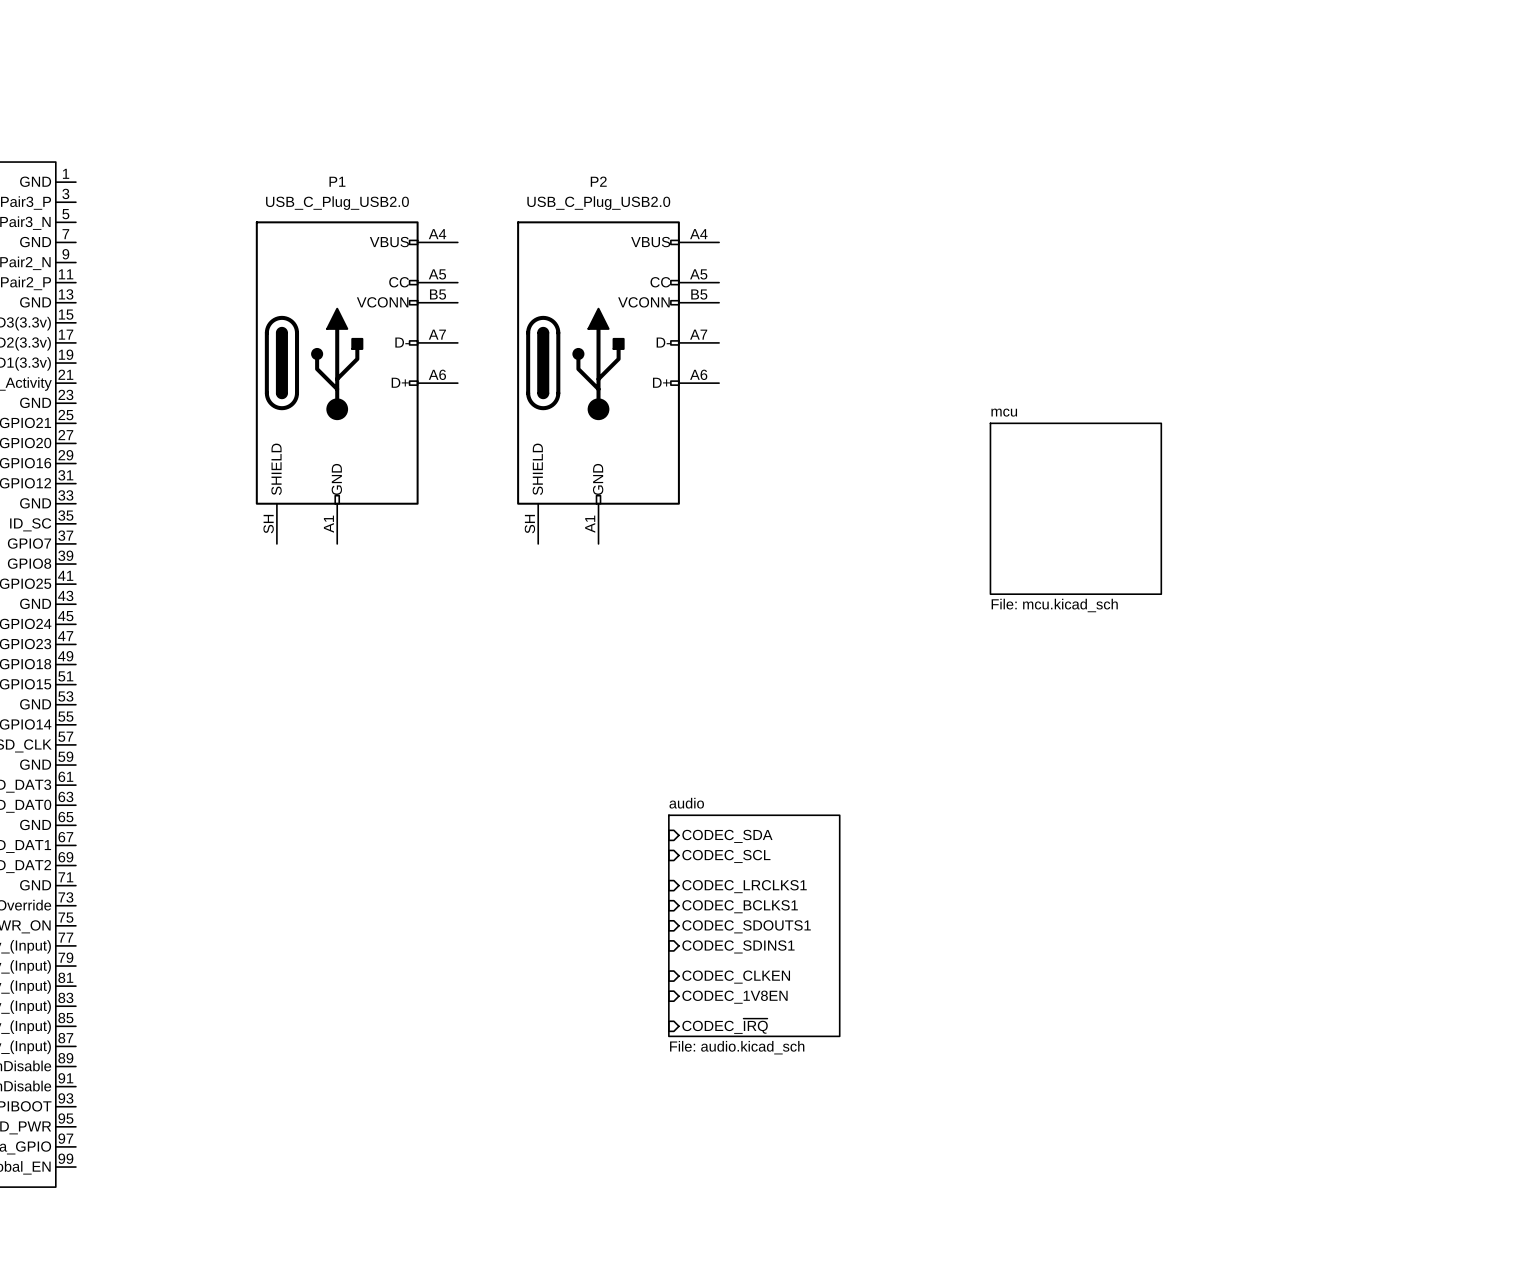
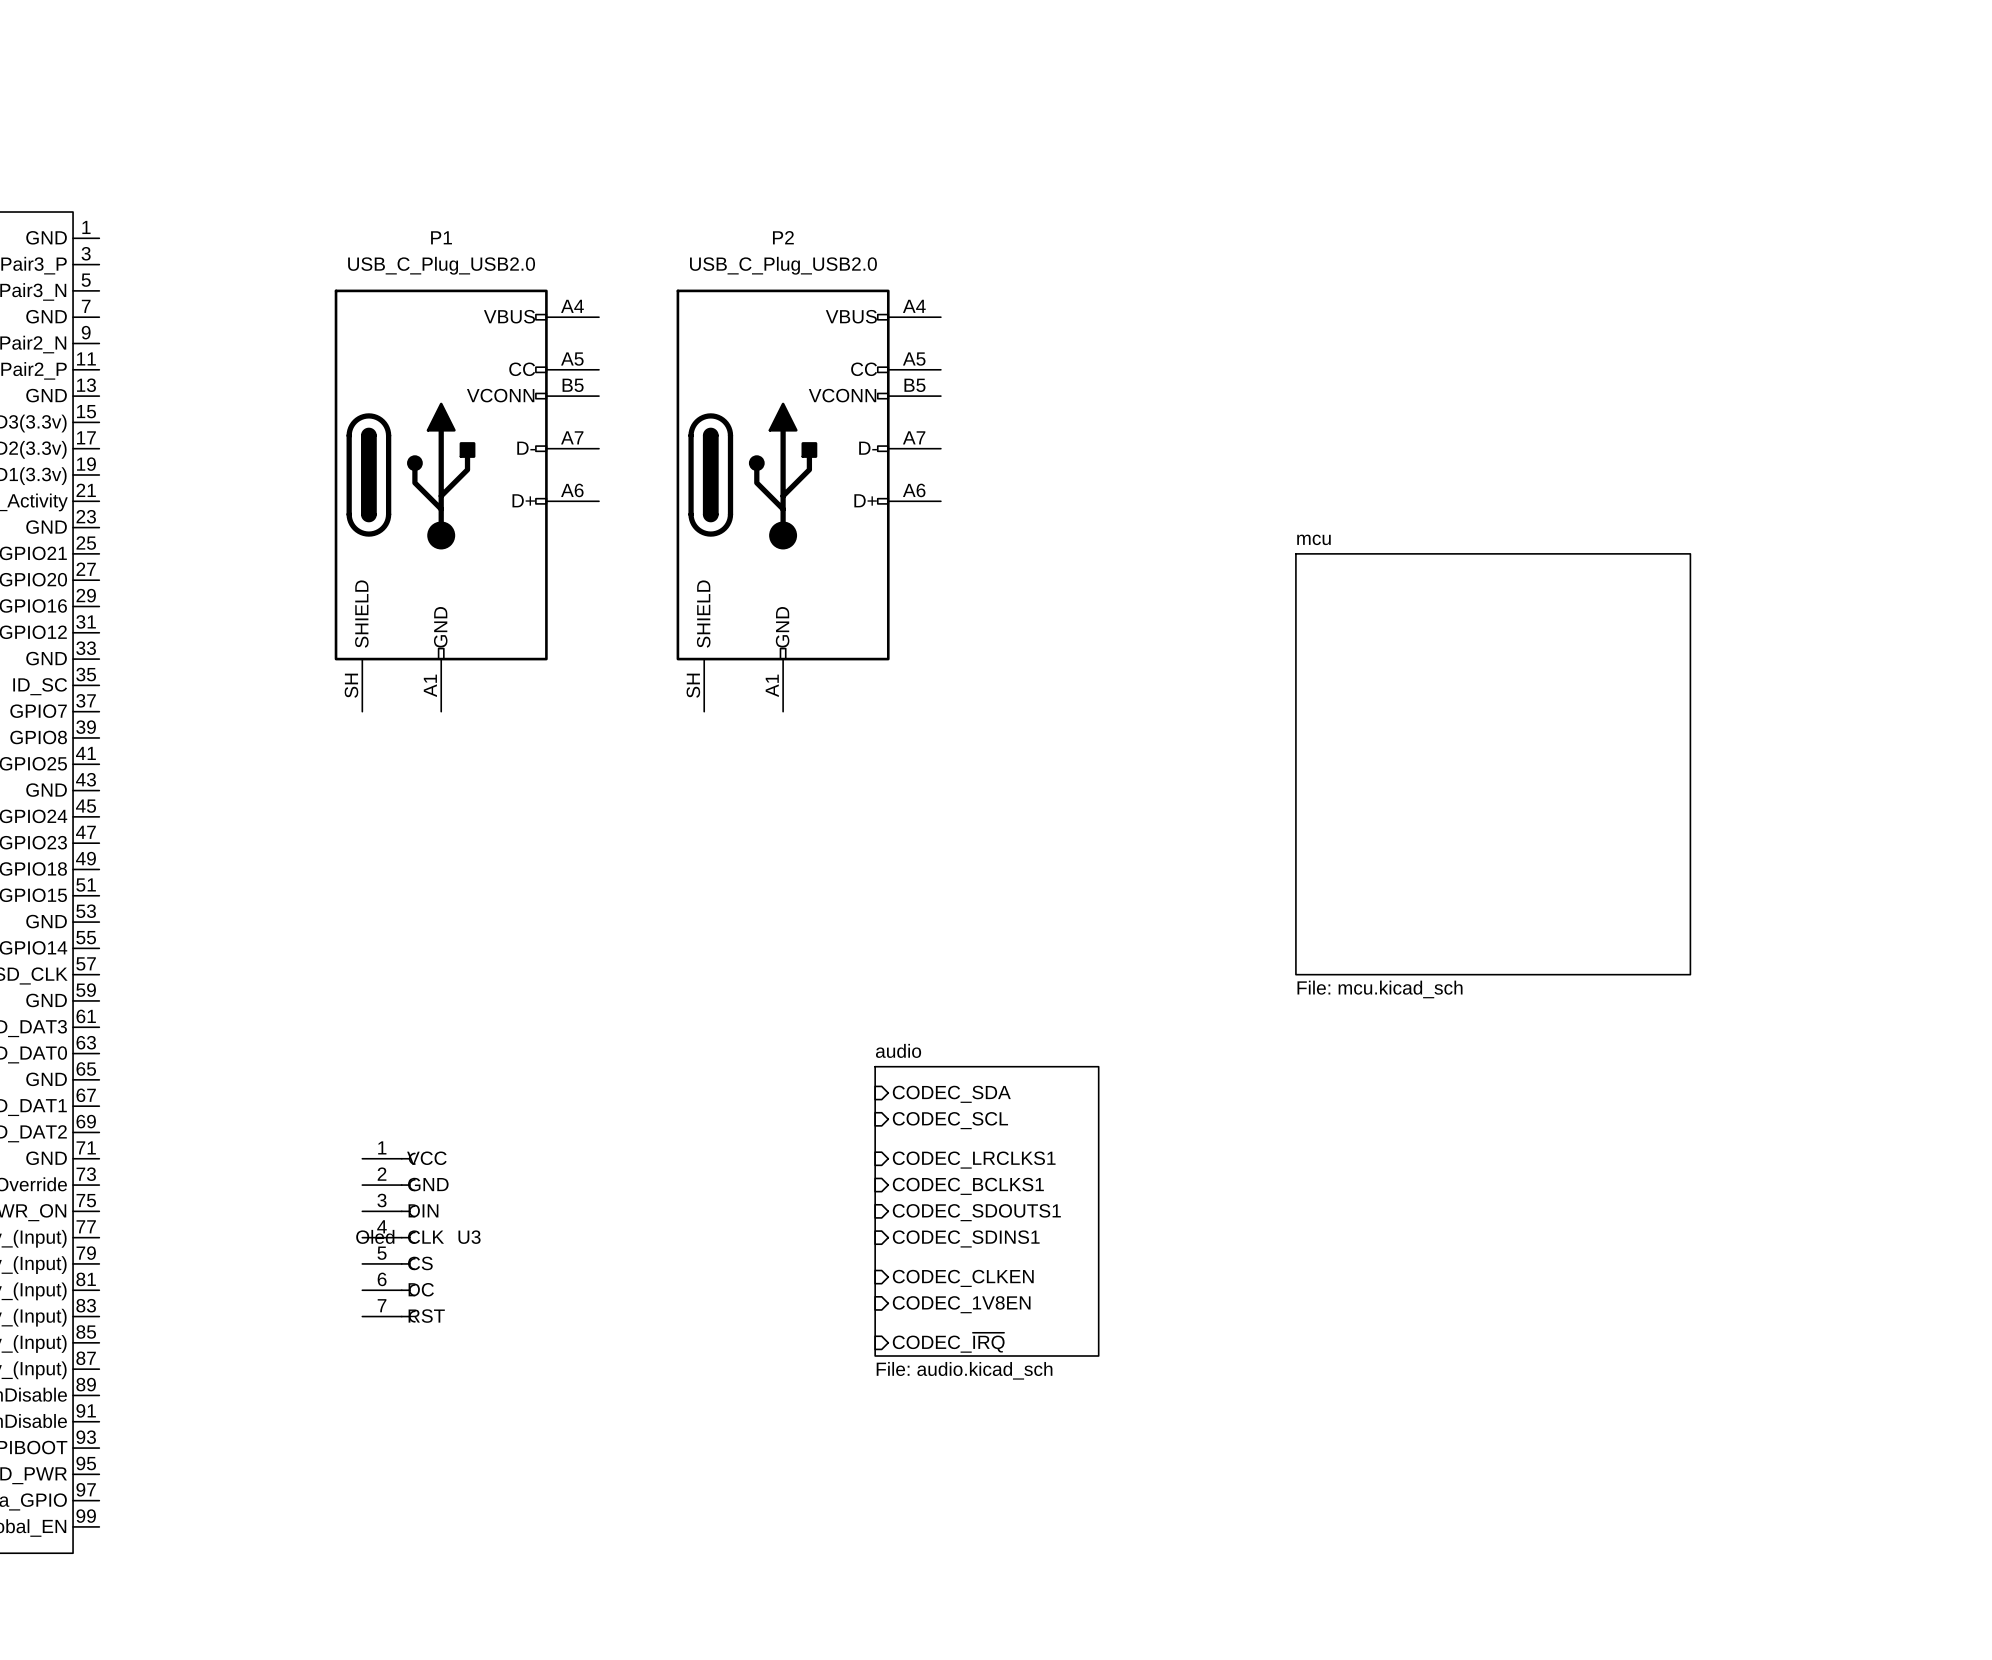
sheet mcu: File: mcu.kicad_sch (1075, 508) -> none
sheet mcu: none -> File: mcu.kicad_sch (1493, 764)
U3: none -> Oled (389, 1237)

